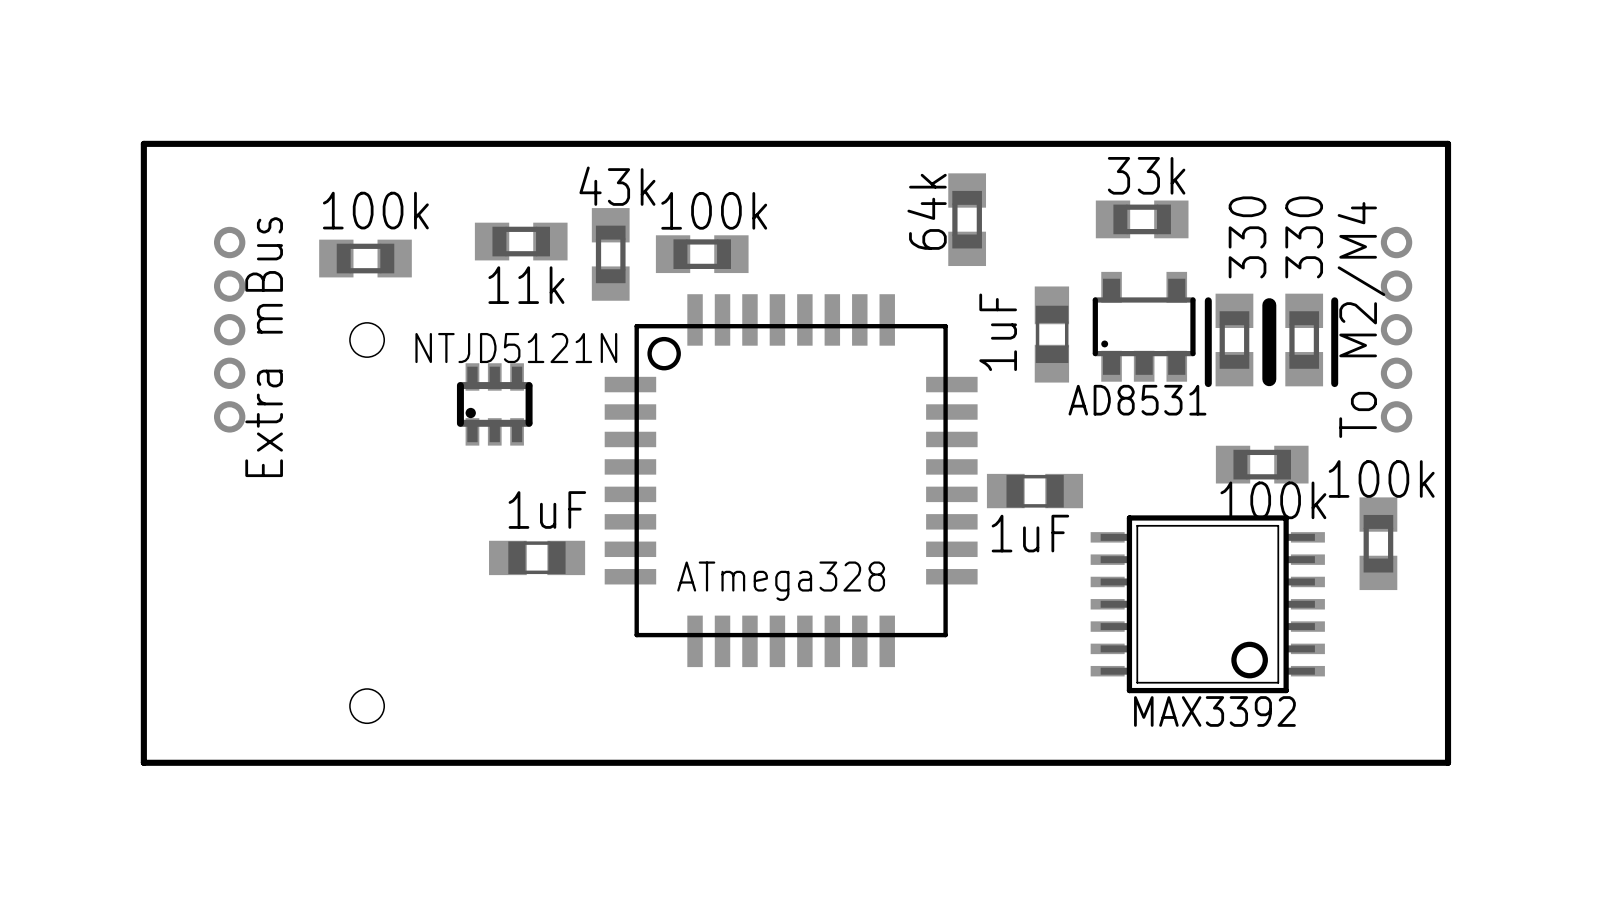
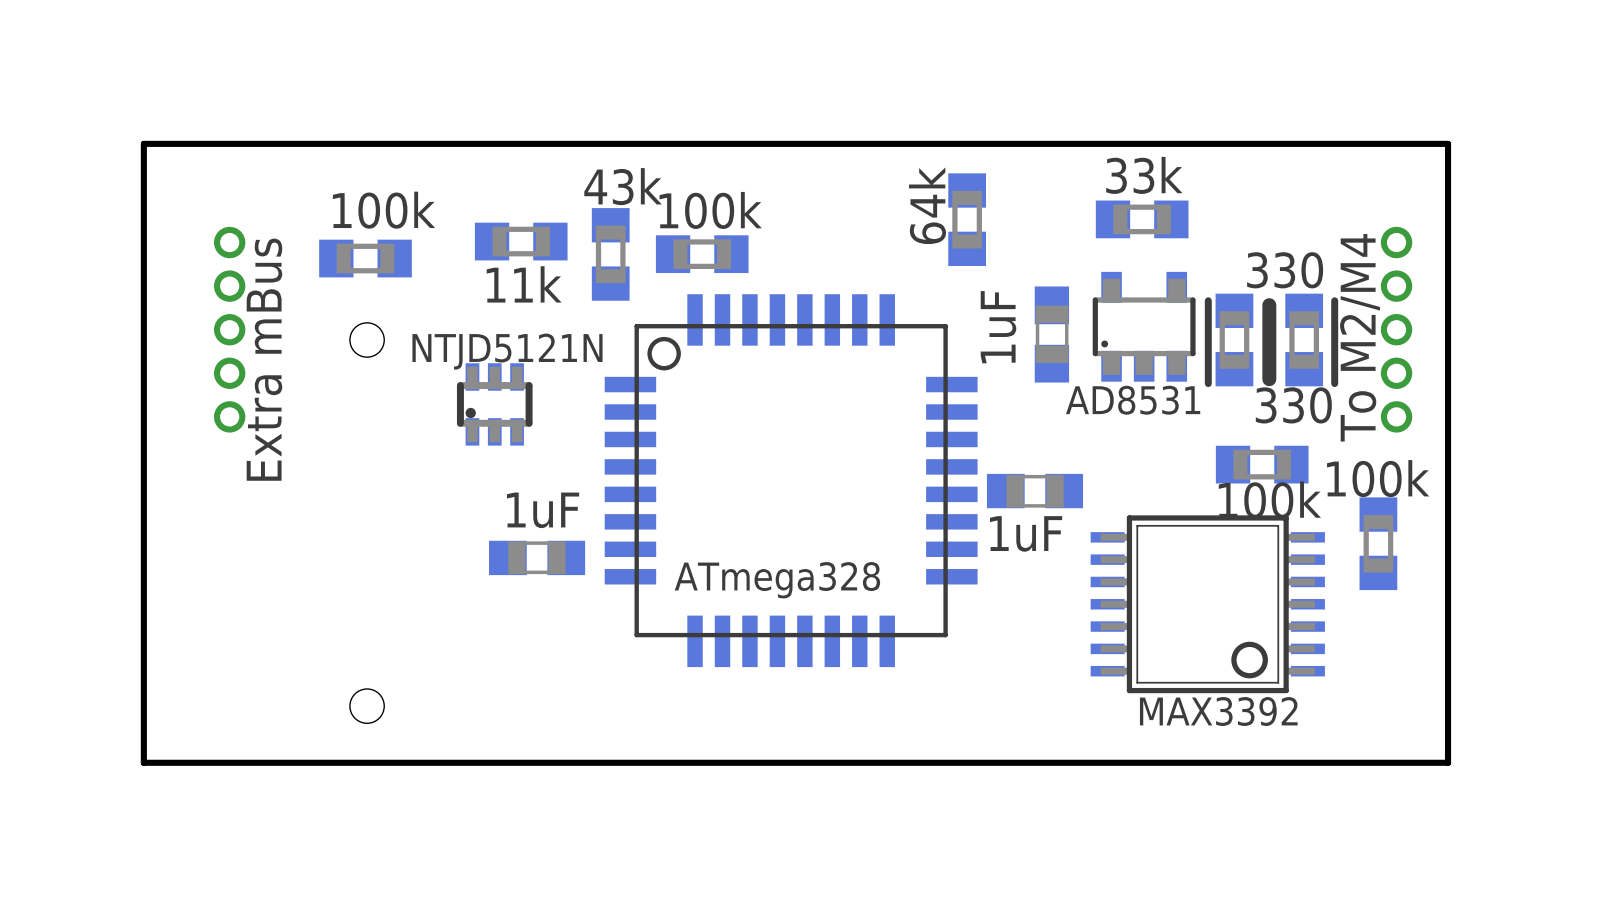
part value rotation: 0° (1247, 237) -> 90° clockwise (1293, 405)
part value position: 330 (1247, 237) -> 330 (1293, 405)
part value rotation: 0° (1304, 237) -> 90° clockwise (1285, 270)

